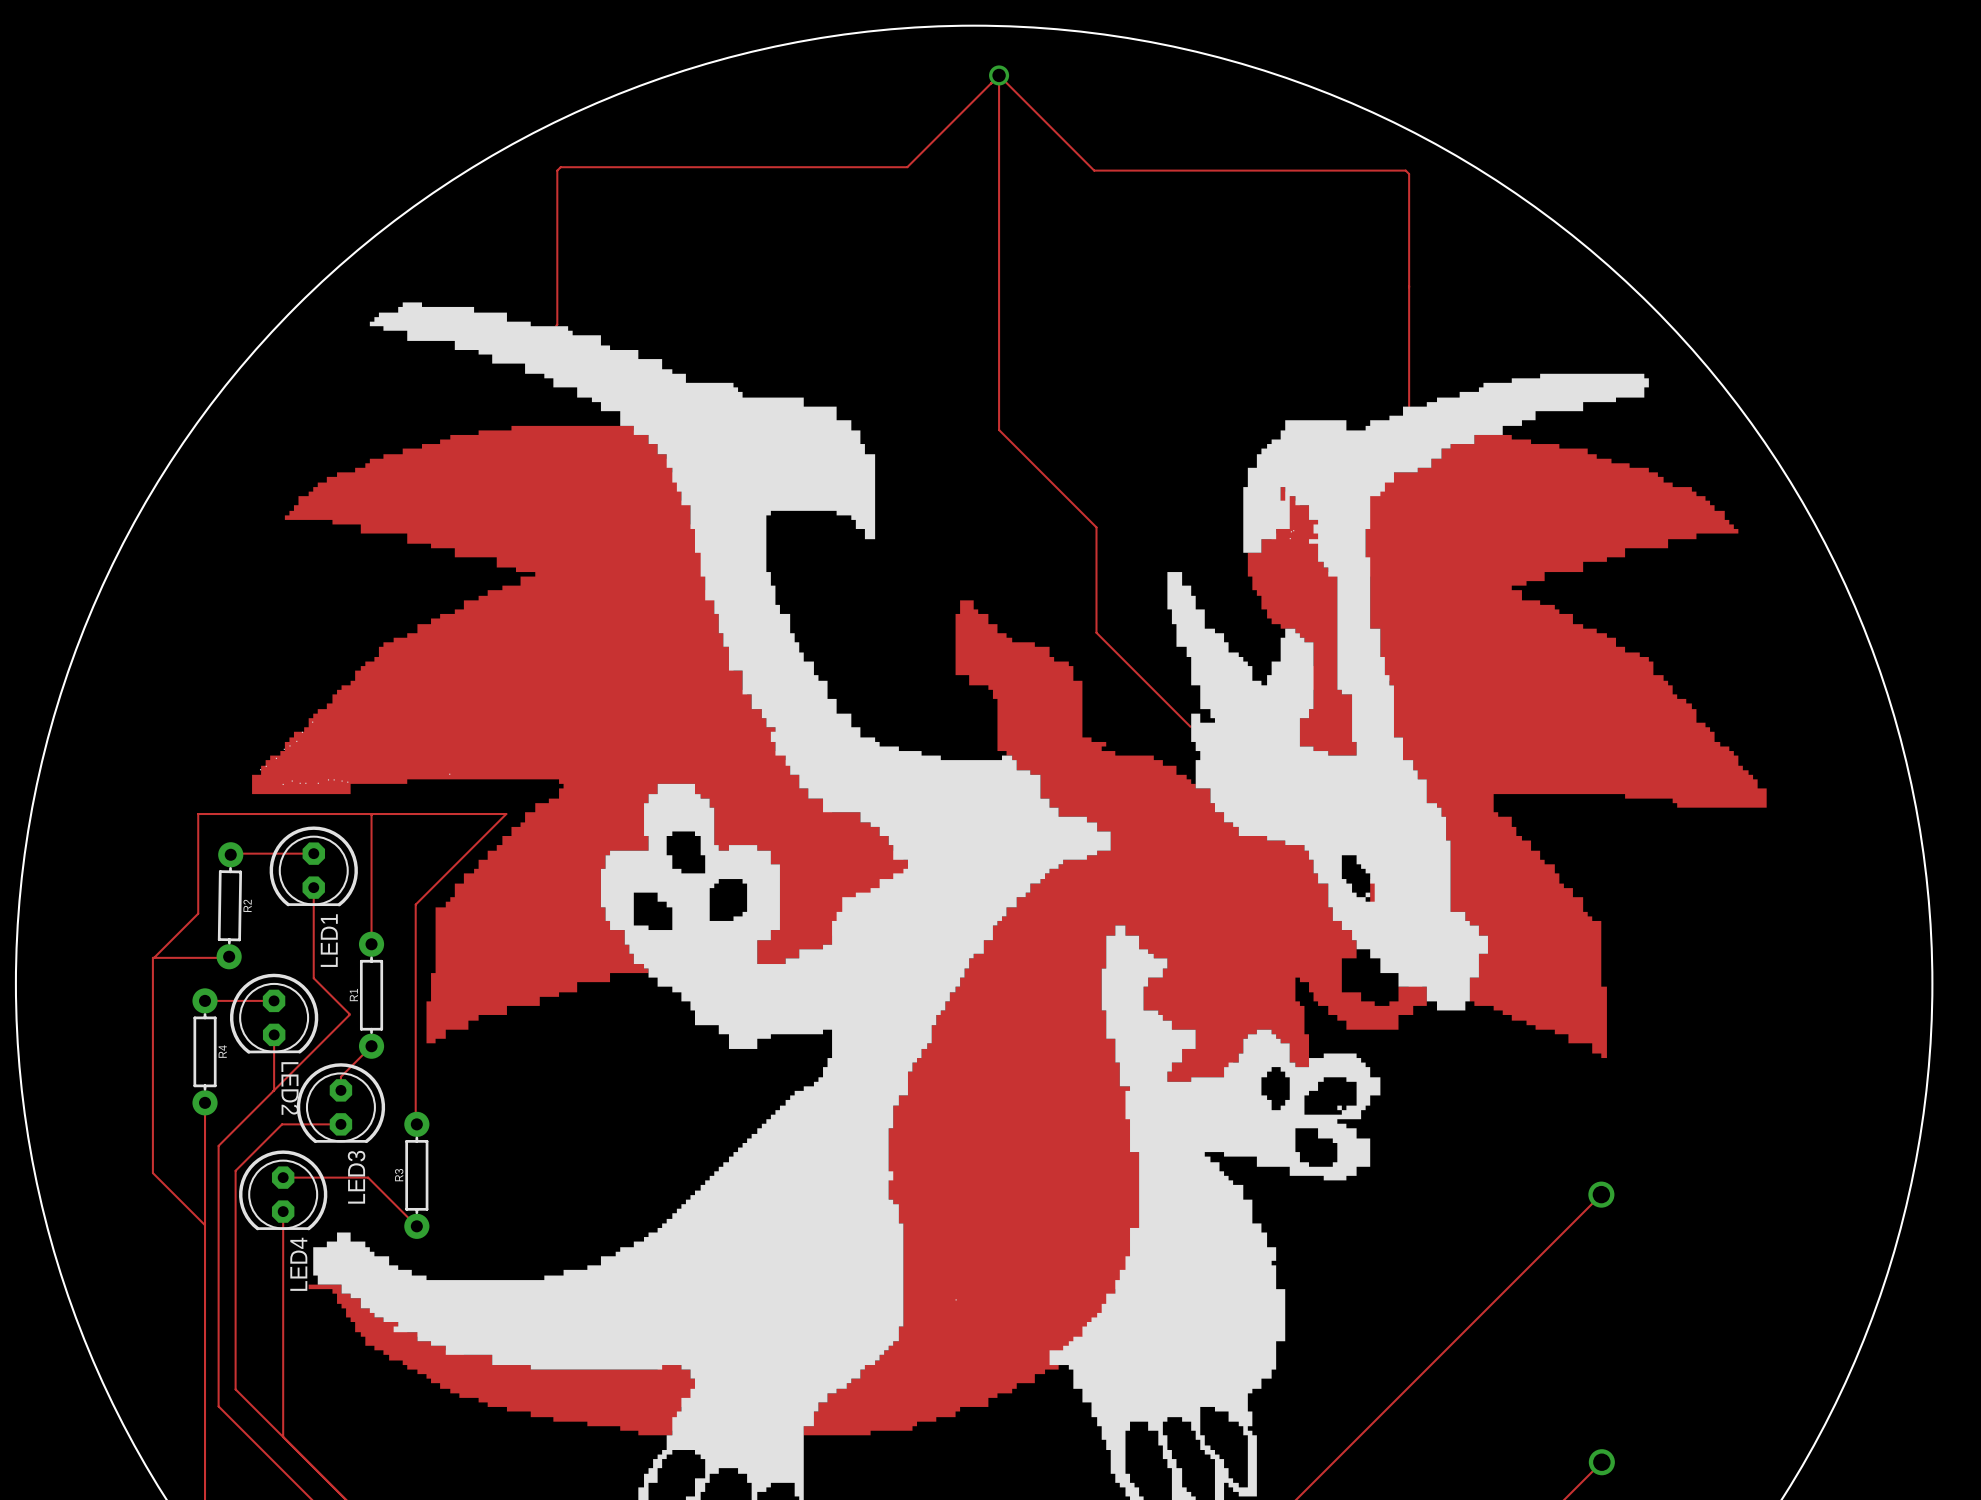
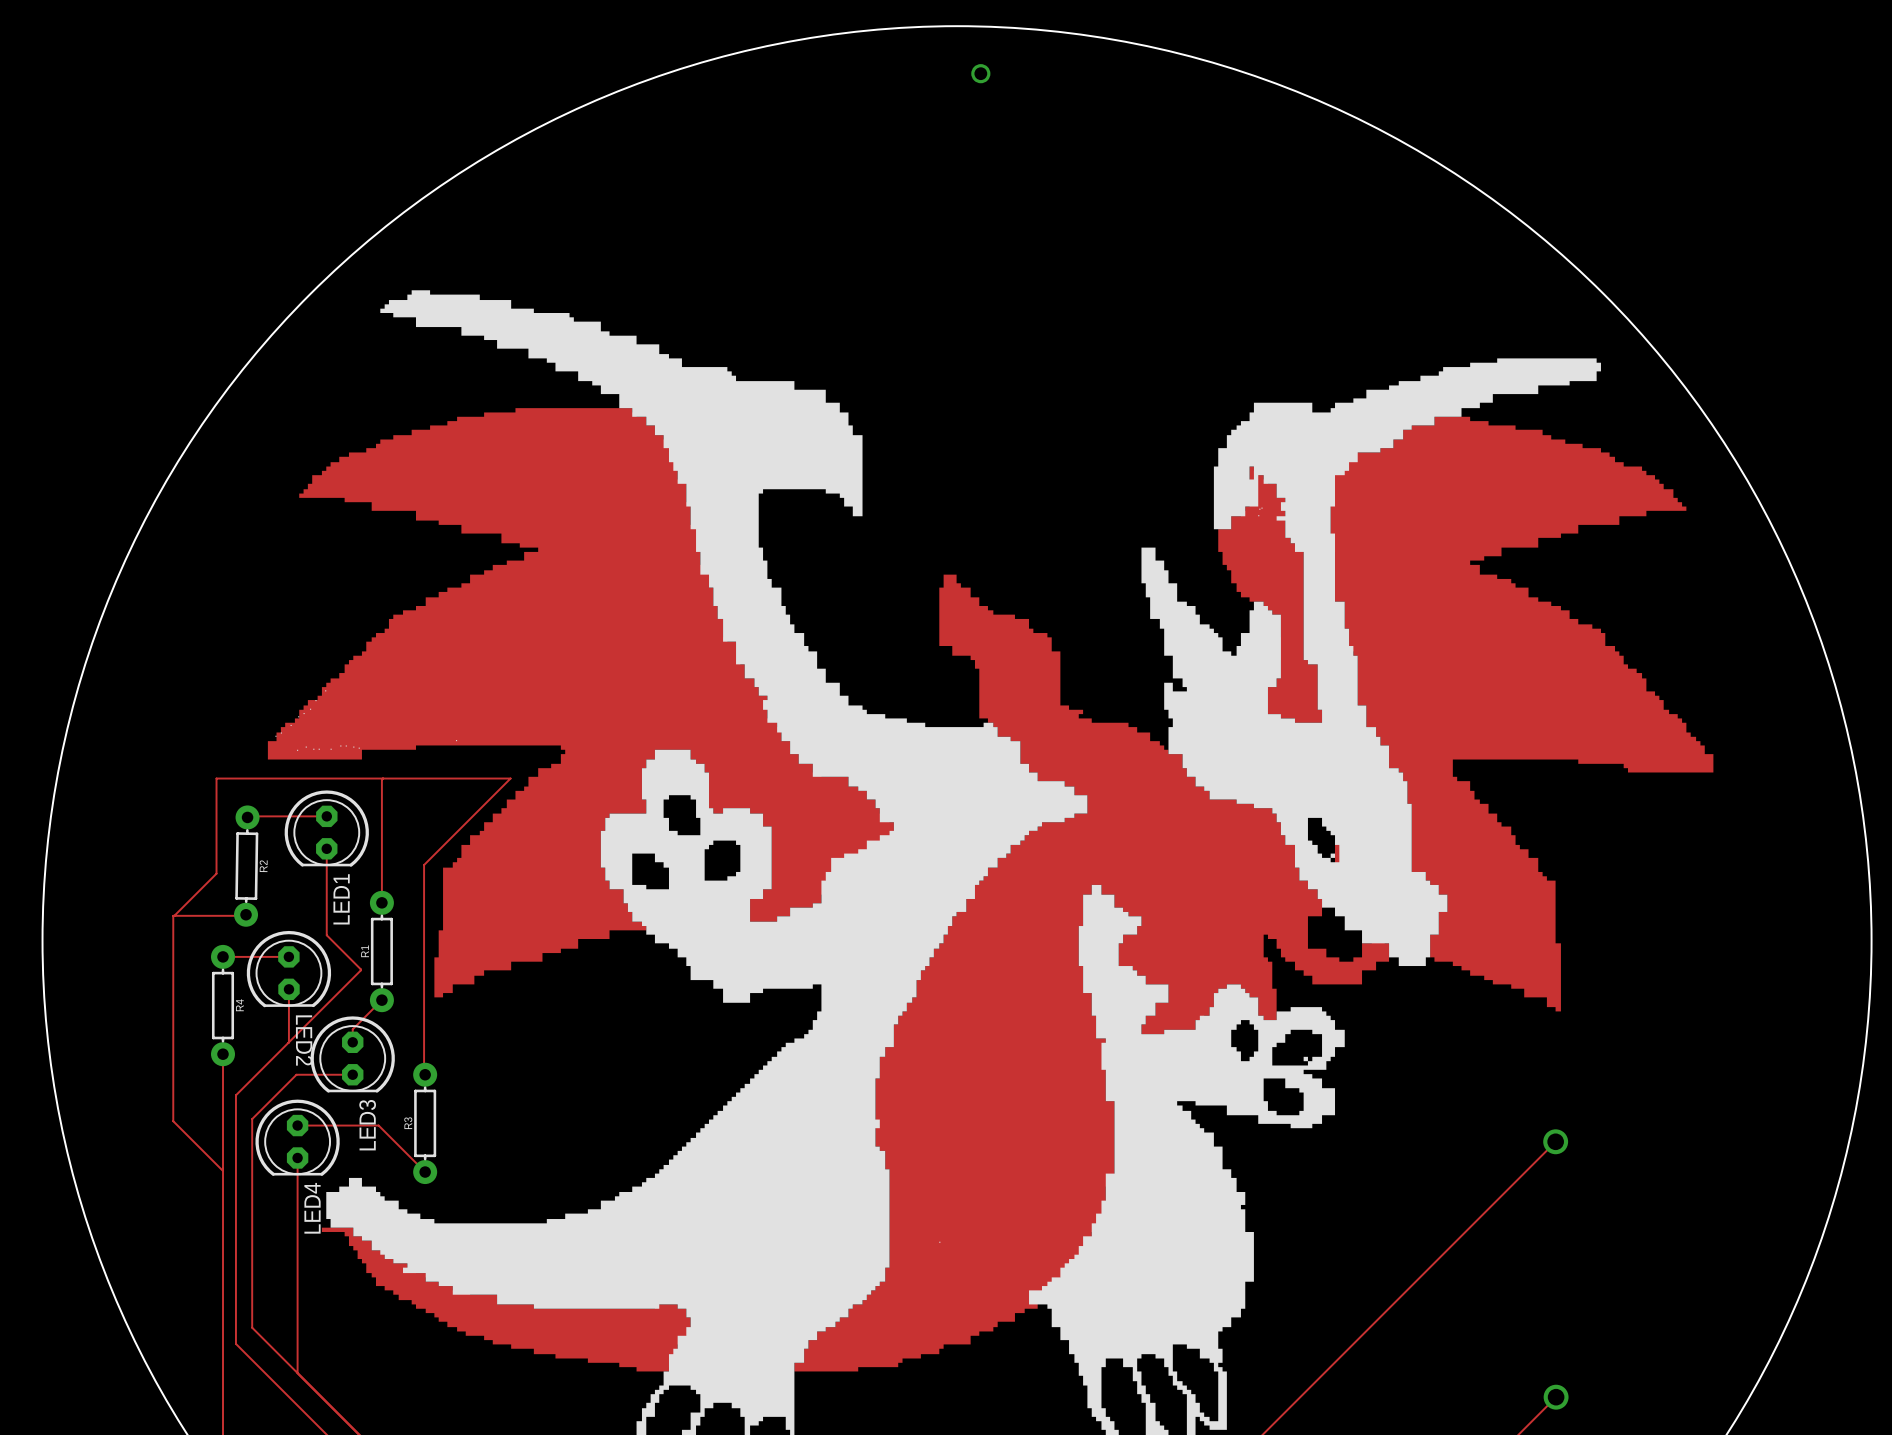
track: (999, 75) (907, 167) (560, 167) (557, 170) (556, 325) -> none
track: (999, 75) (1094, 170) (1405, 170) (1409, 174) (1409, 406) -> none
track: (999, 75) (999, 430) (1096, 527) (1096, 632) (1190, 726) -> none

